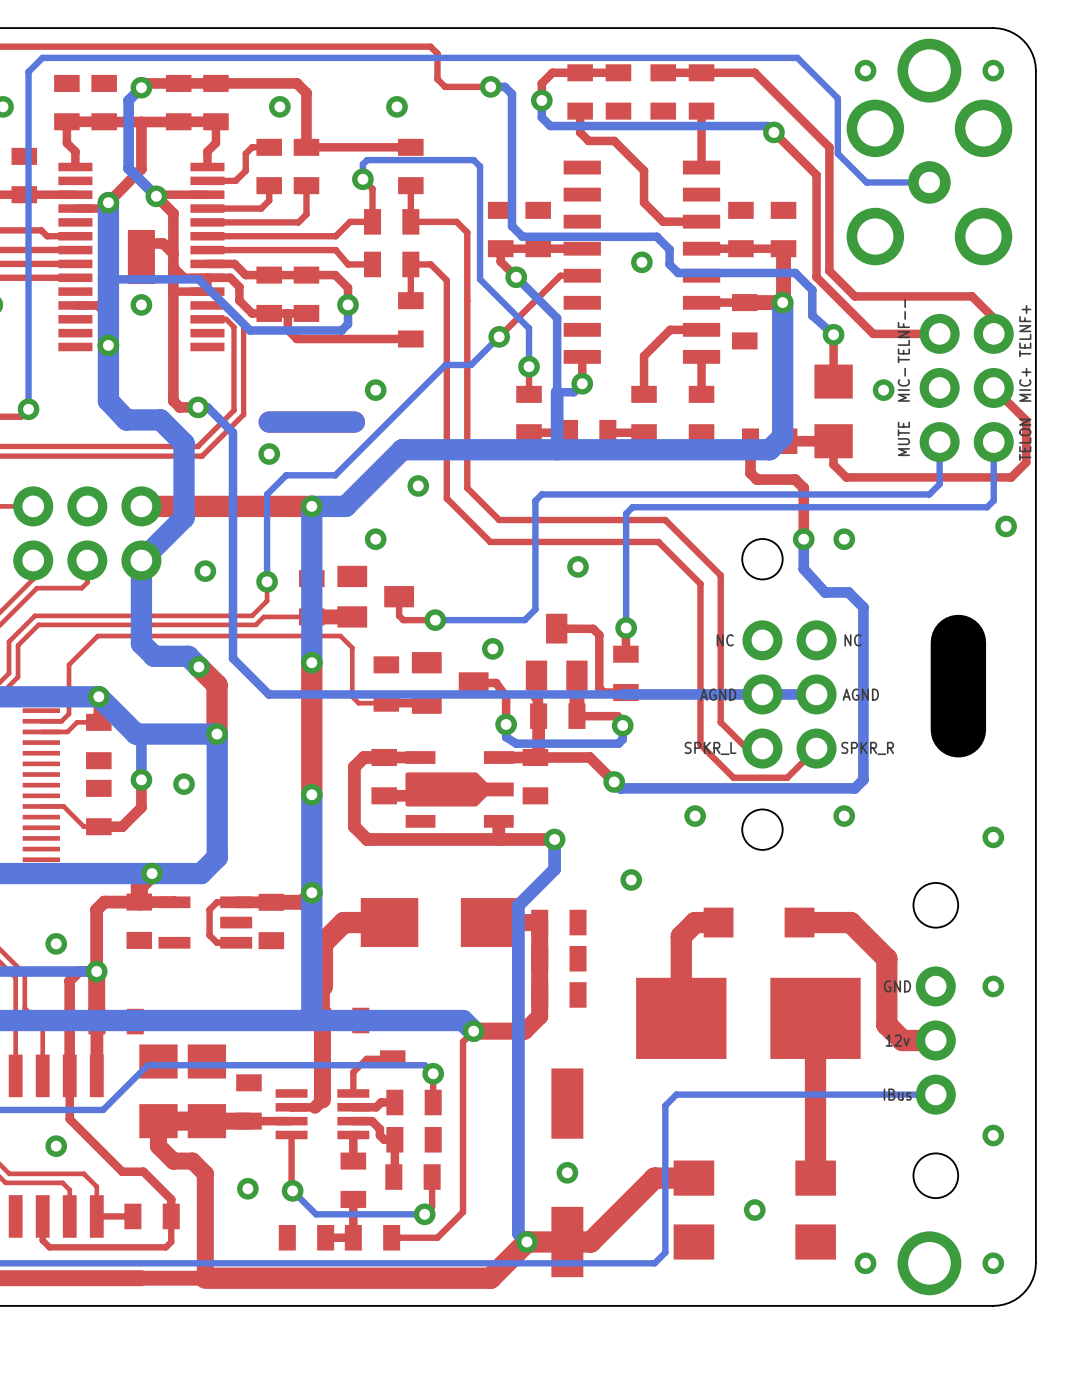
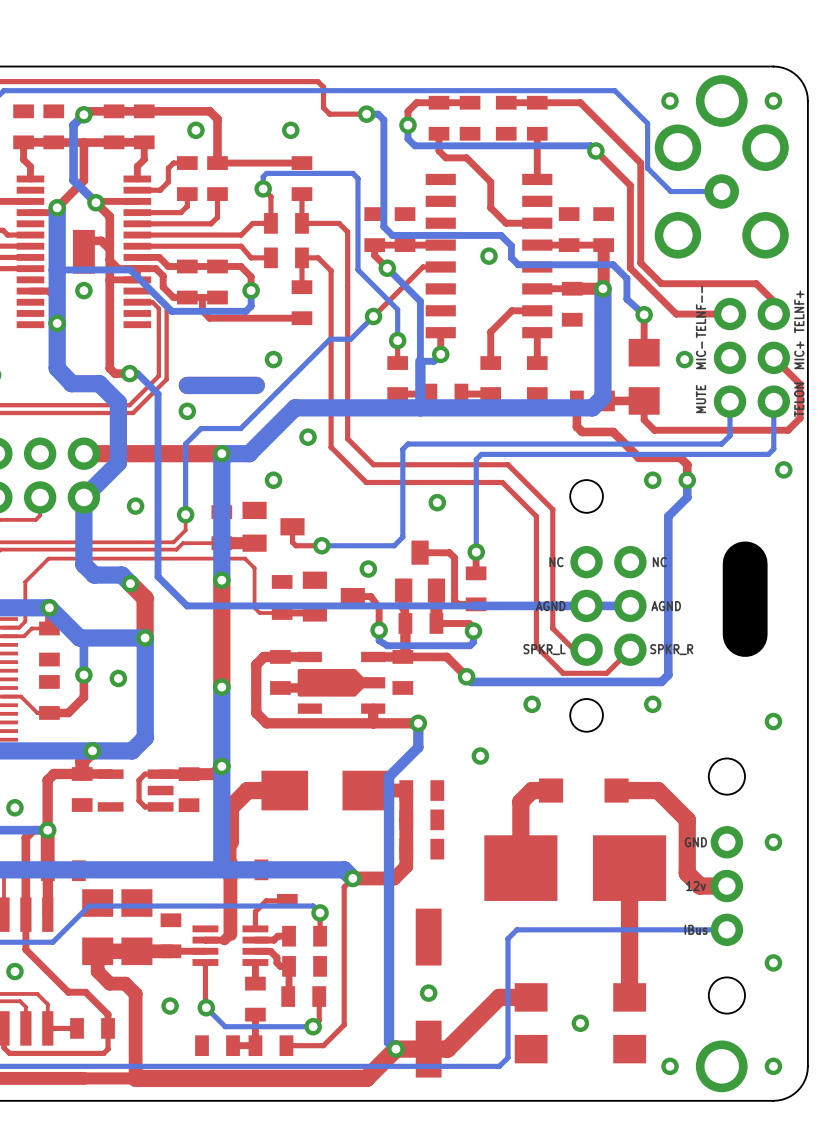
top track: (803, 488) (803, 539) -> (620, 438) (638, 457) (680, 457) (687, 464) (687, 480)
bottom track: (803, 539) (803, 569) (825, 592) (848, 592) (863, 607) -> (687, 480) (687, 497) (668, 516) (668, 535)
via position: (803, 539) -> (687, 480)

